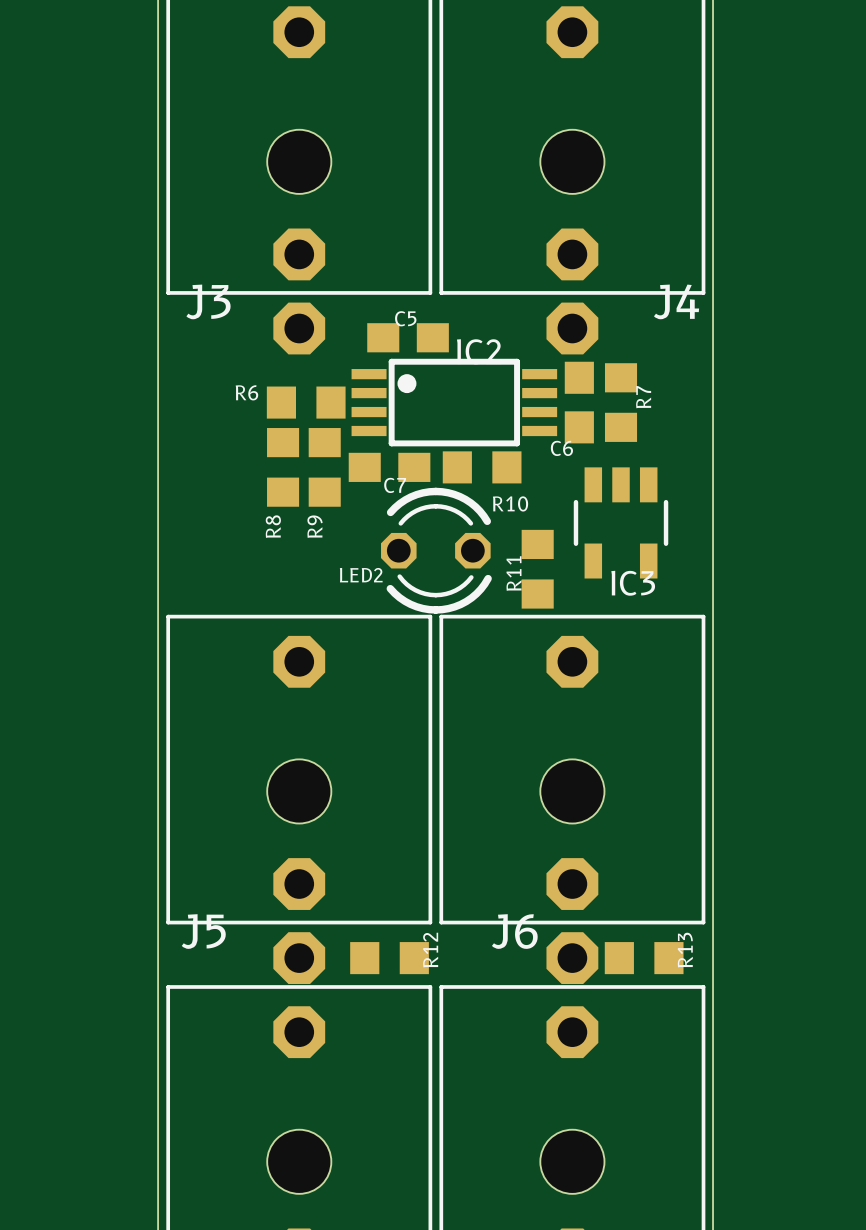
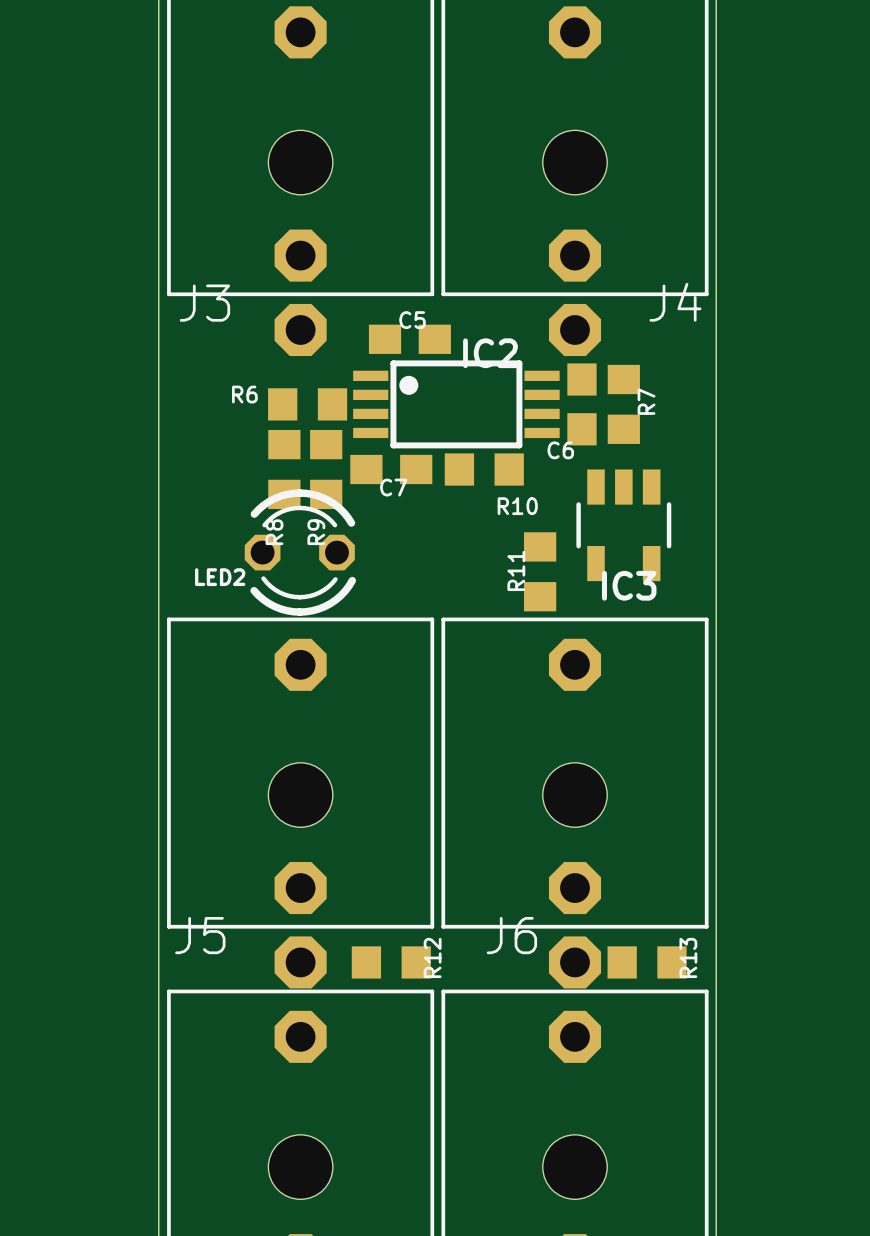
LED2 position: (436, 550) -> (300, 552)

